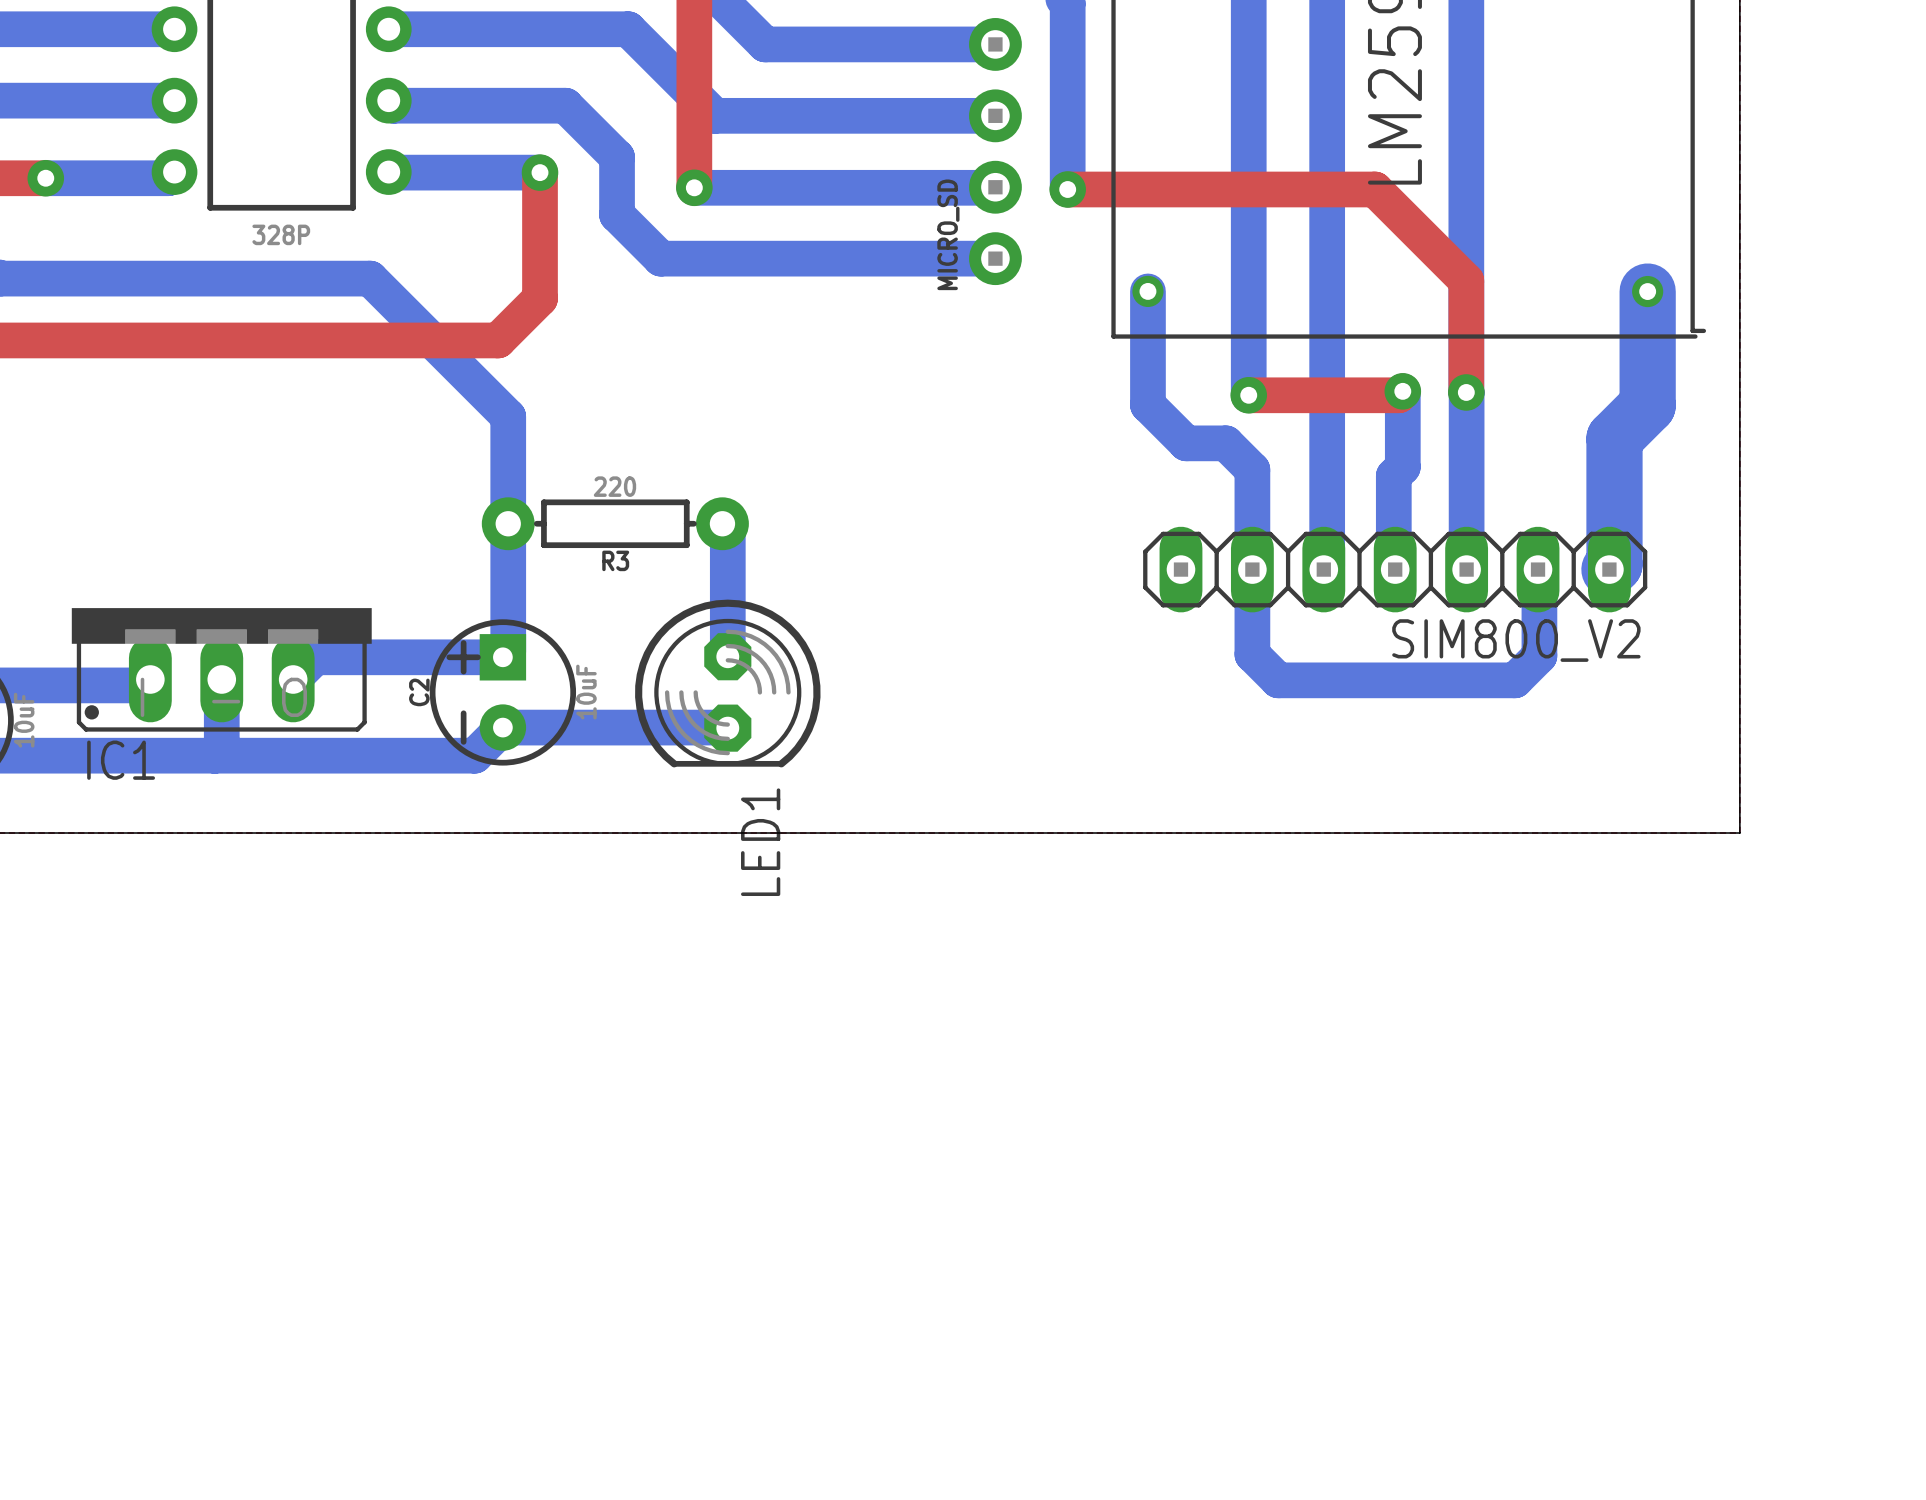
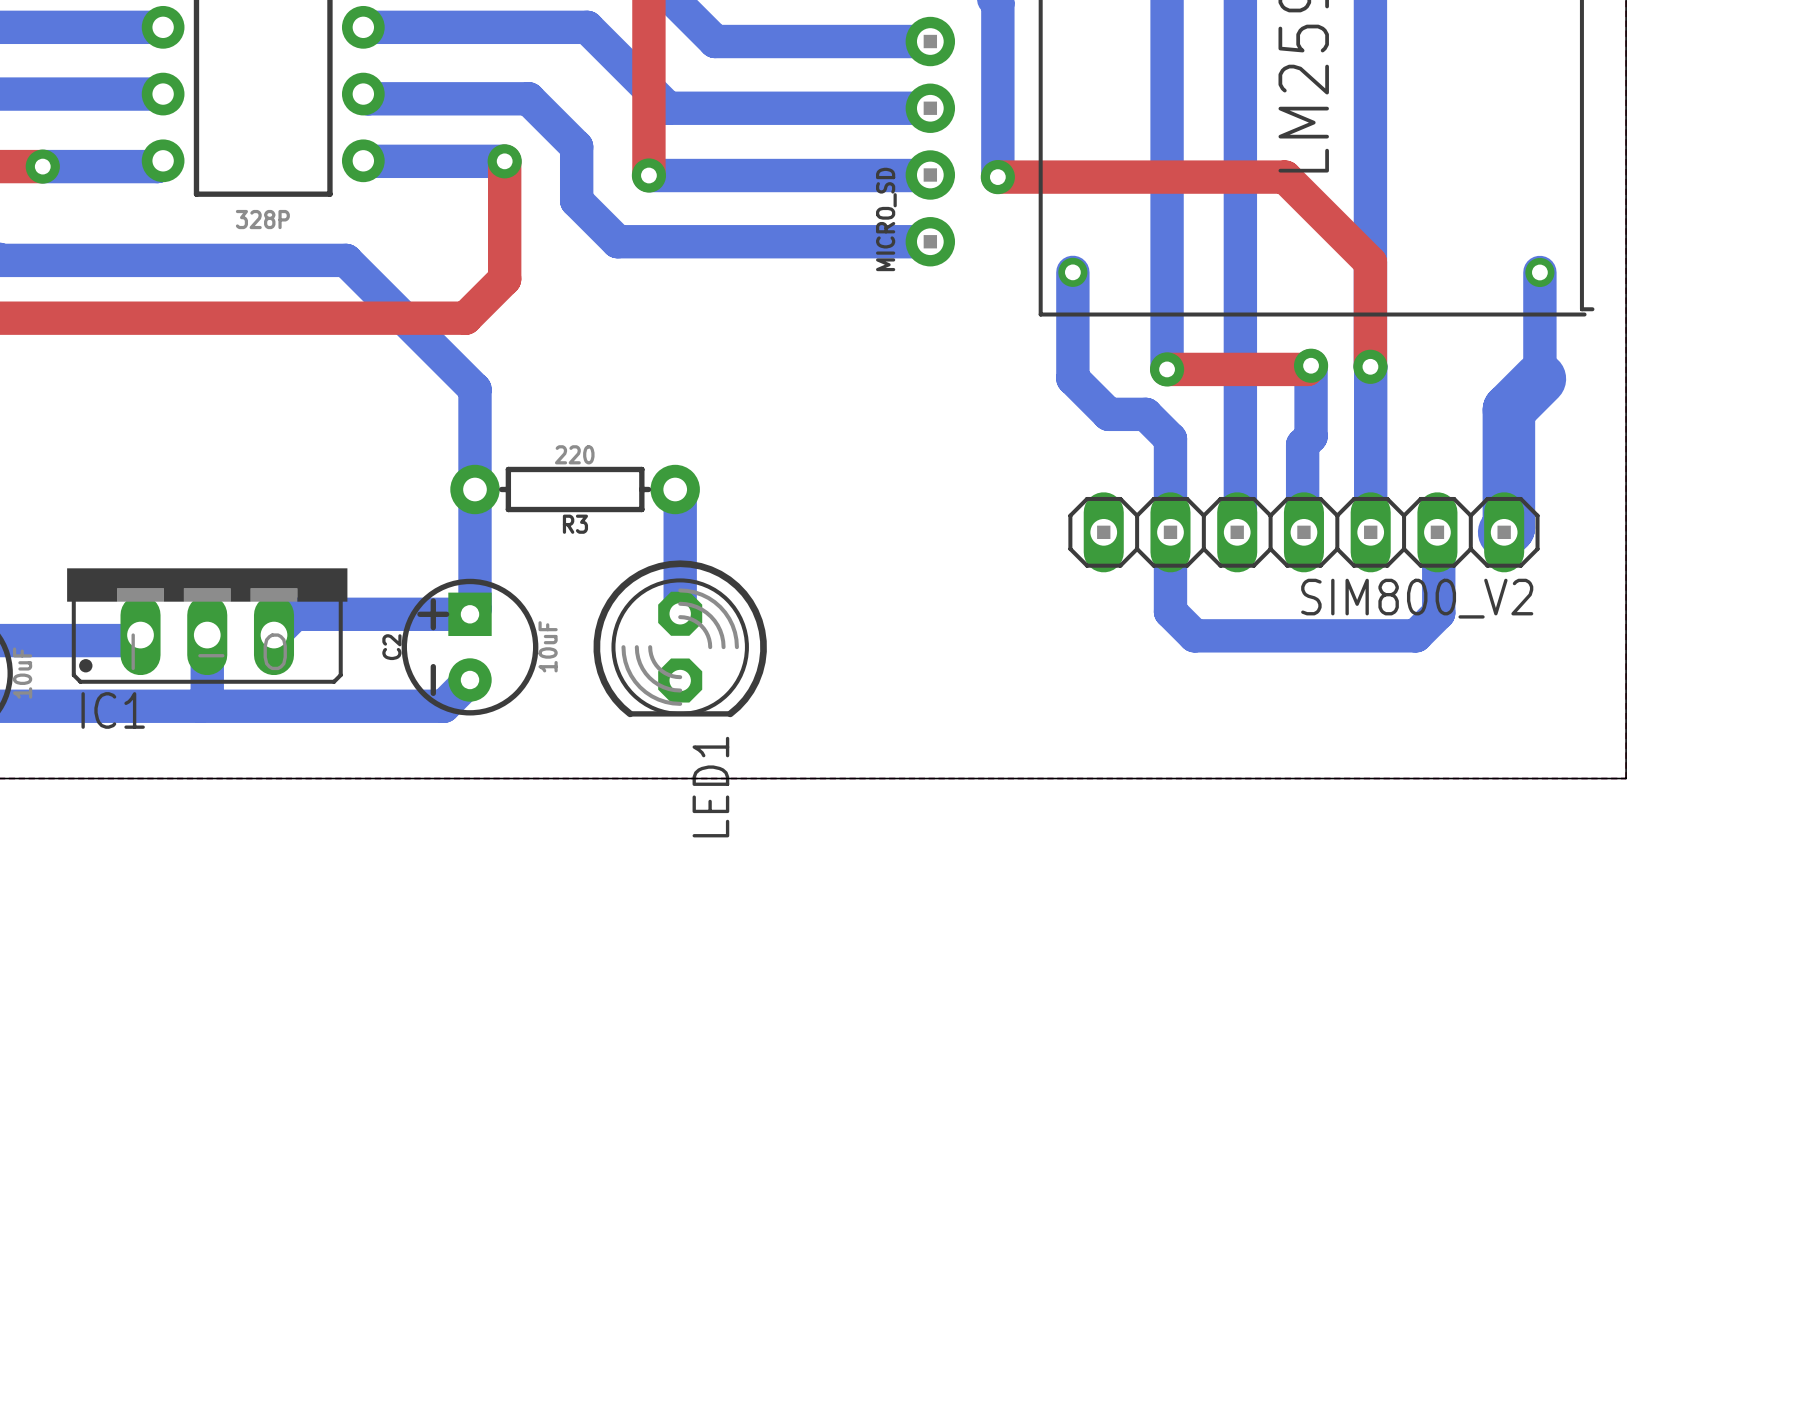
bottom track width: thick (1647, 291) (1647, 405) -> thin (1539, 272) (1539, 378)
bottom track: (502, 727) (727, 728) -> none

